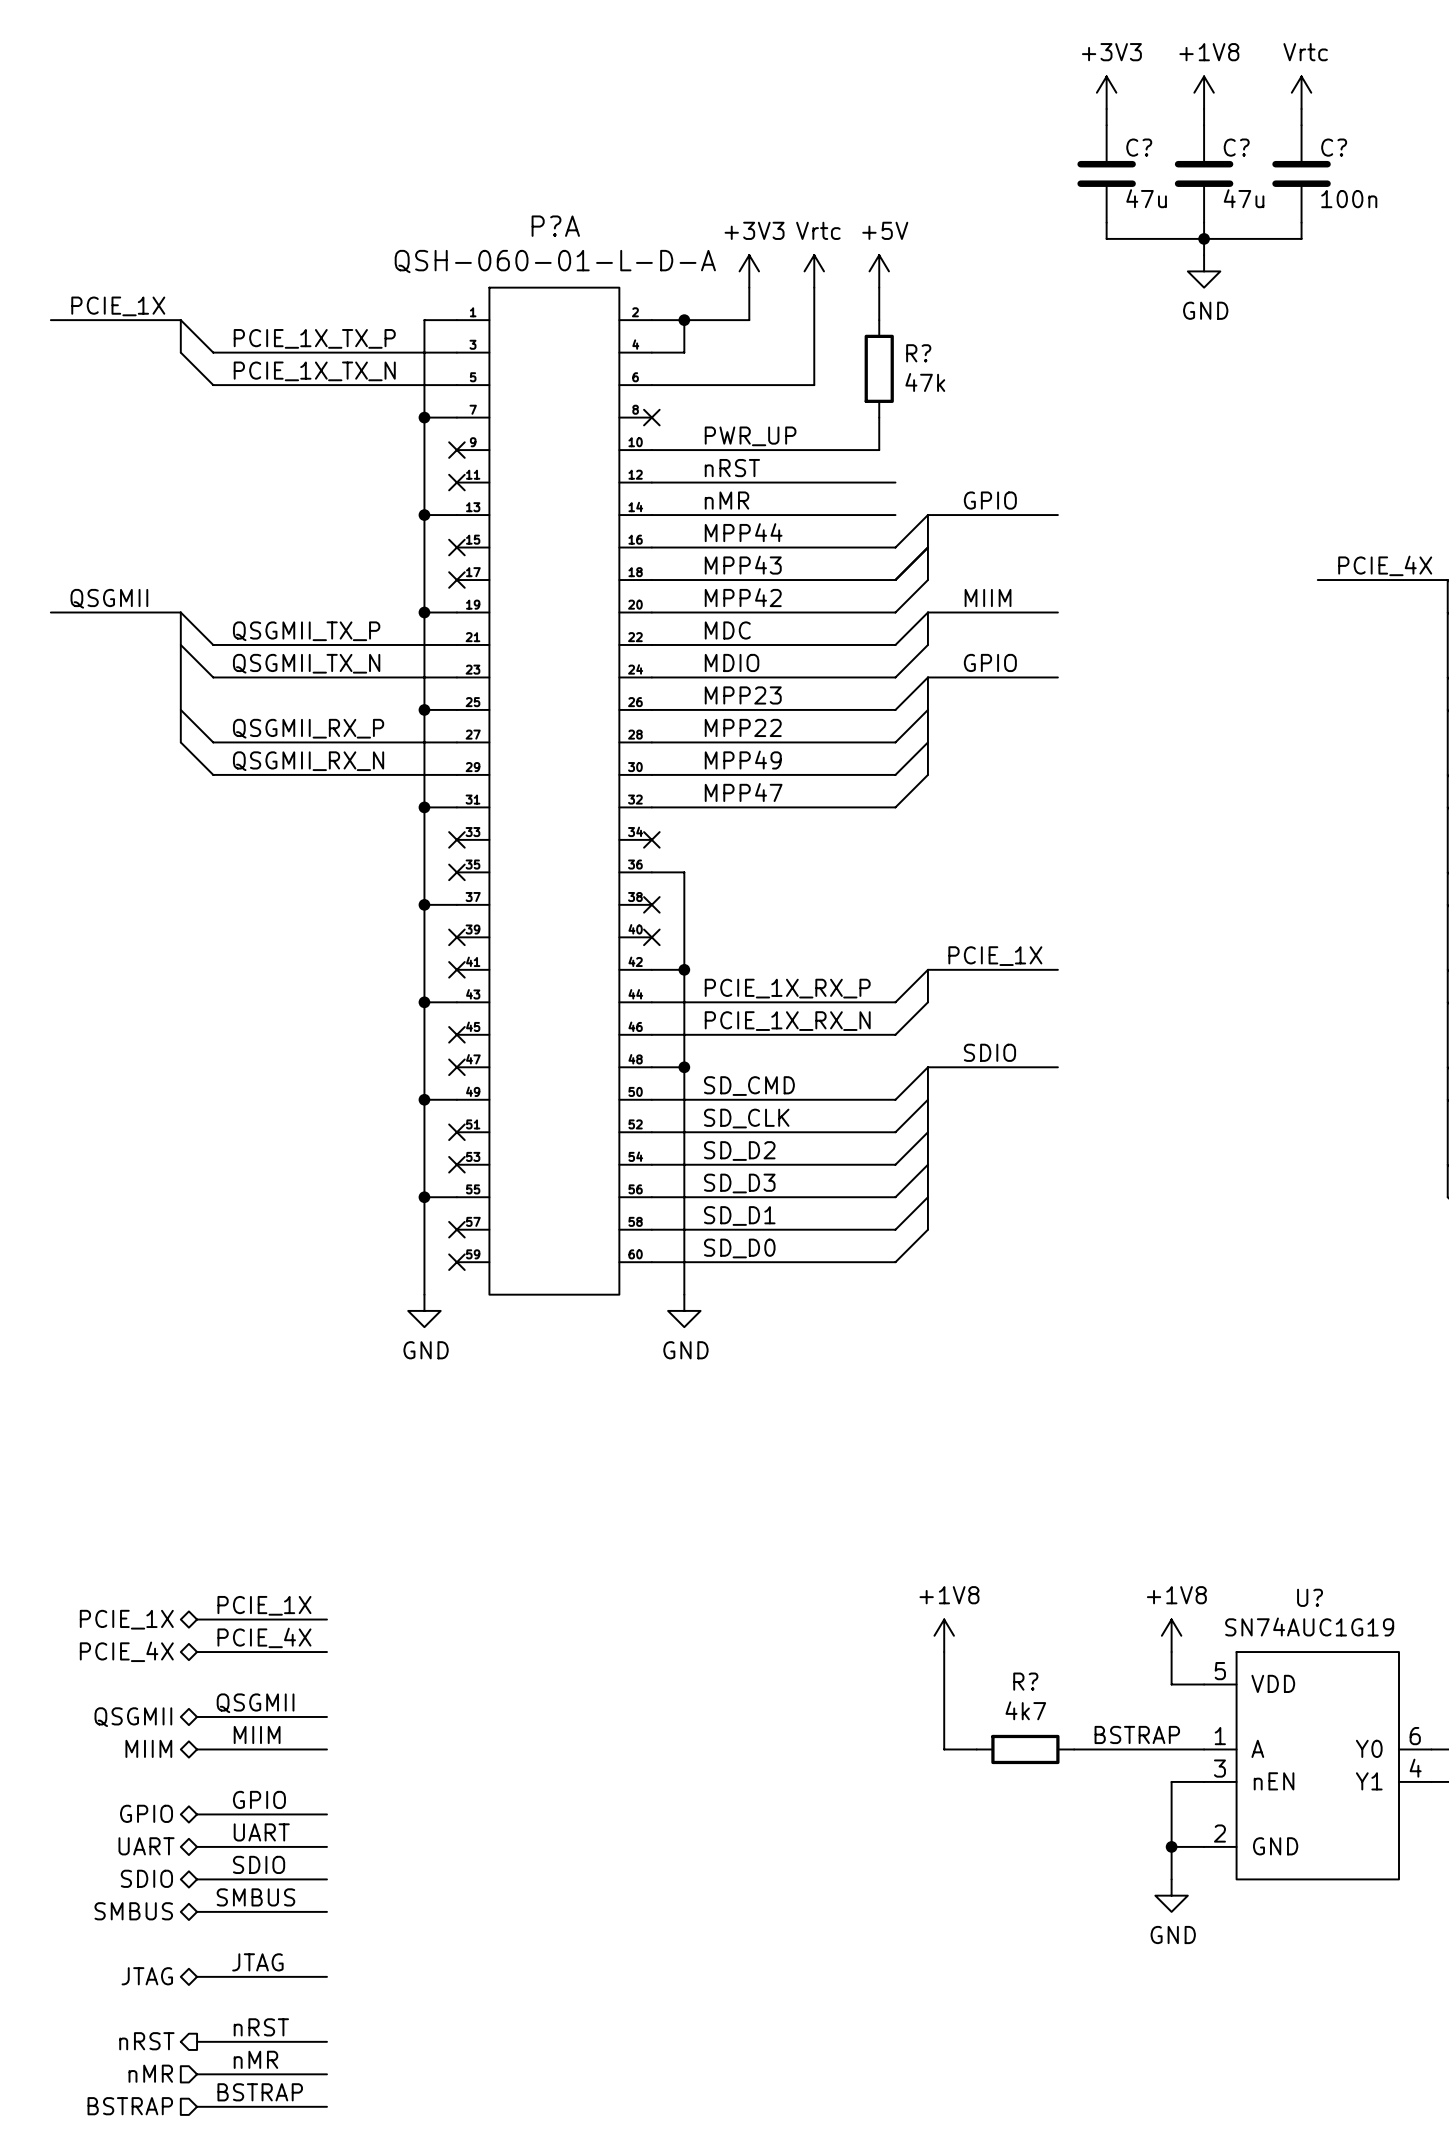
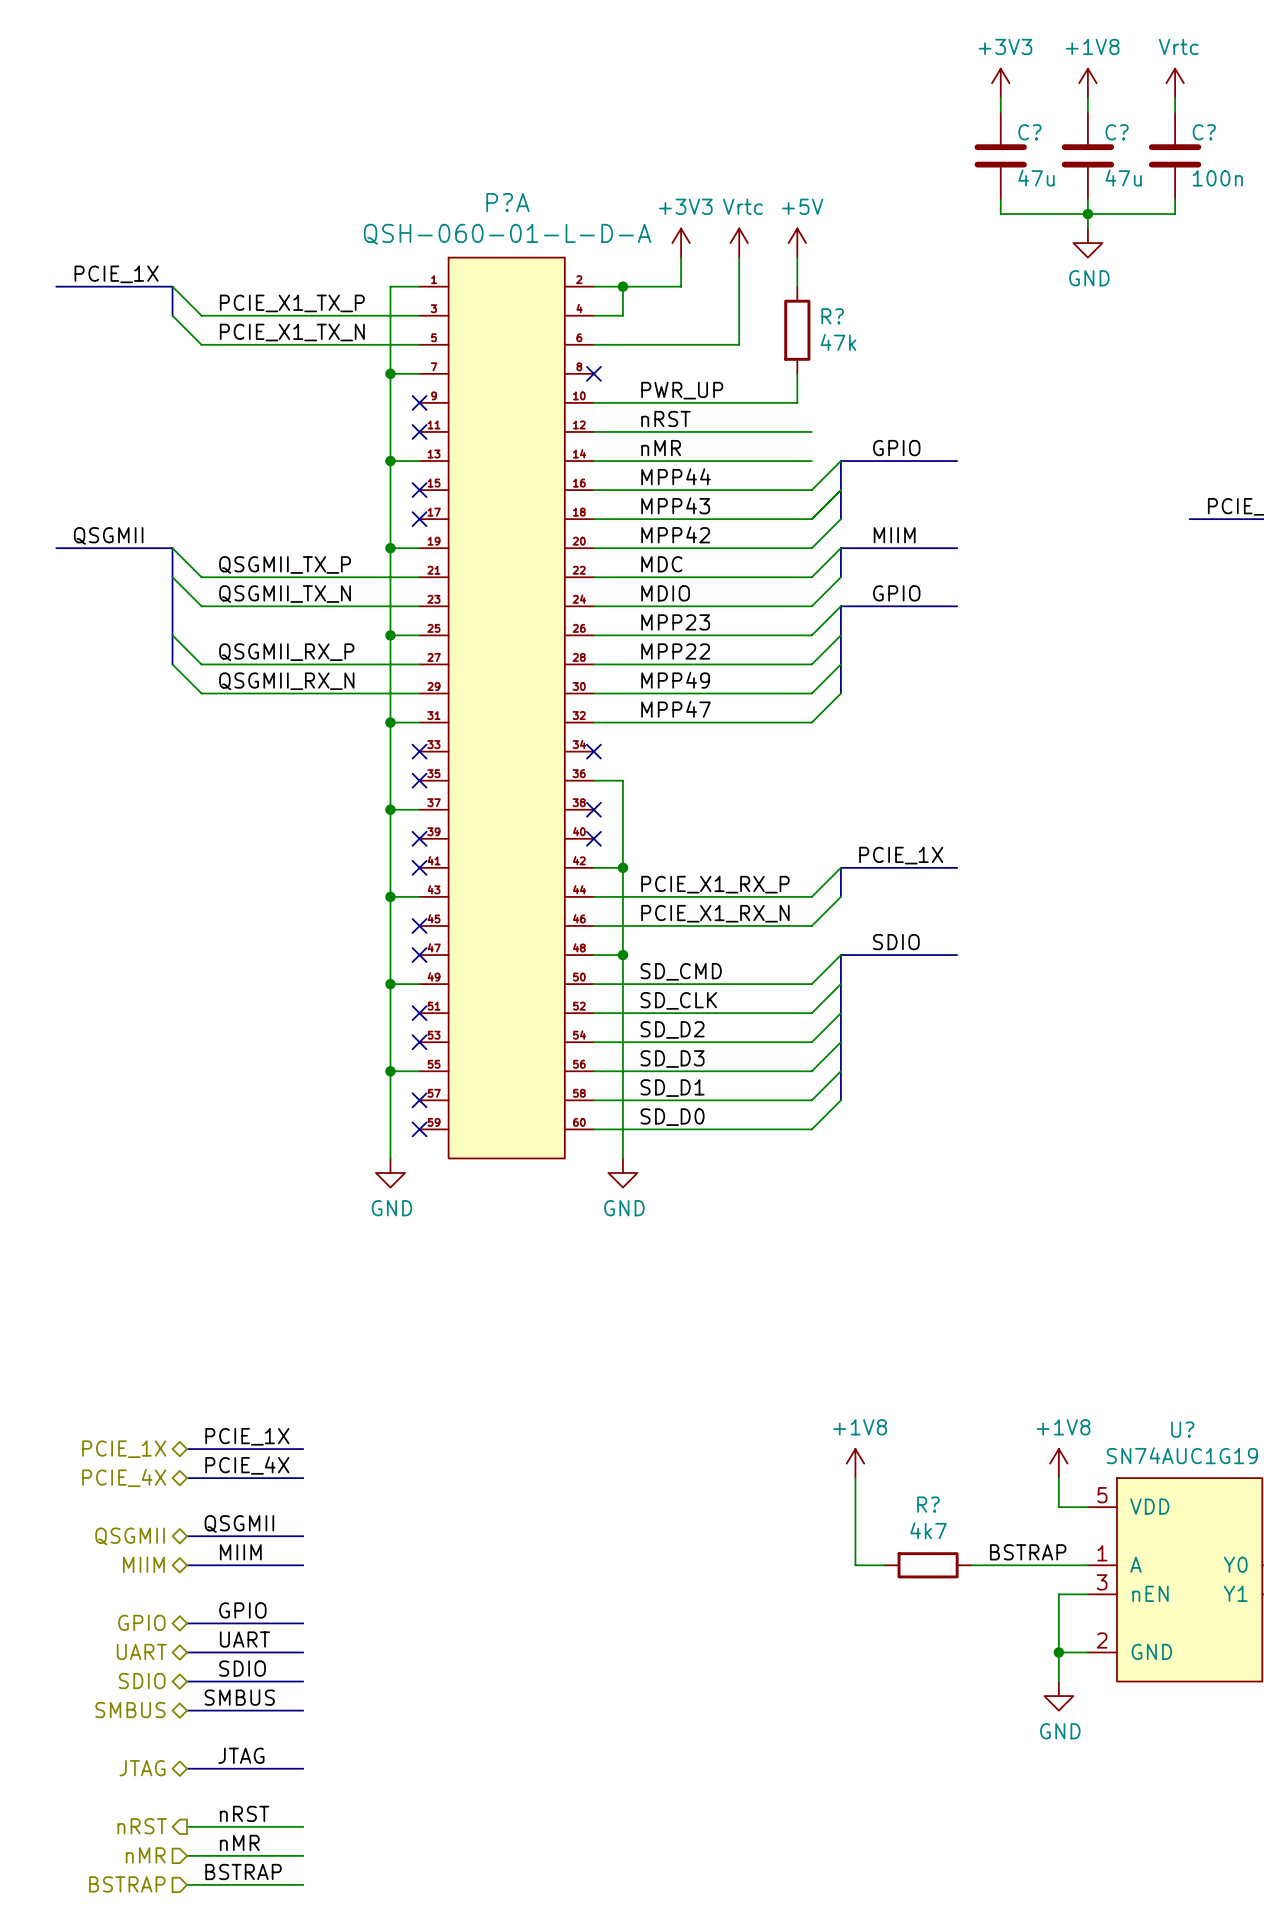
label: PCIE_1X_TX_P (314, 338) -> PCIE_X1_TX_P (292, 303)
label: PCIE_1X_TX_N (314, 371) -> PCIE_X1_TX_N (292, 332)
label: PCIE_1X_RX_P (787, 988) -> PCIE_X1_RX_P (715, 884)
label: PCIE_1X_RX_N (787, 1021) -> PCIE_X1_RX_N (715, 913)

